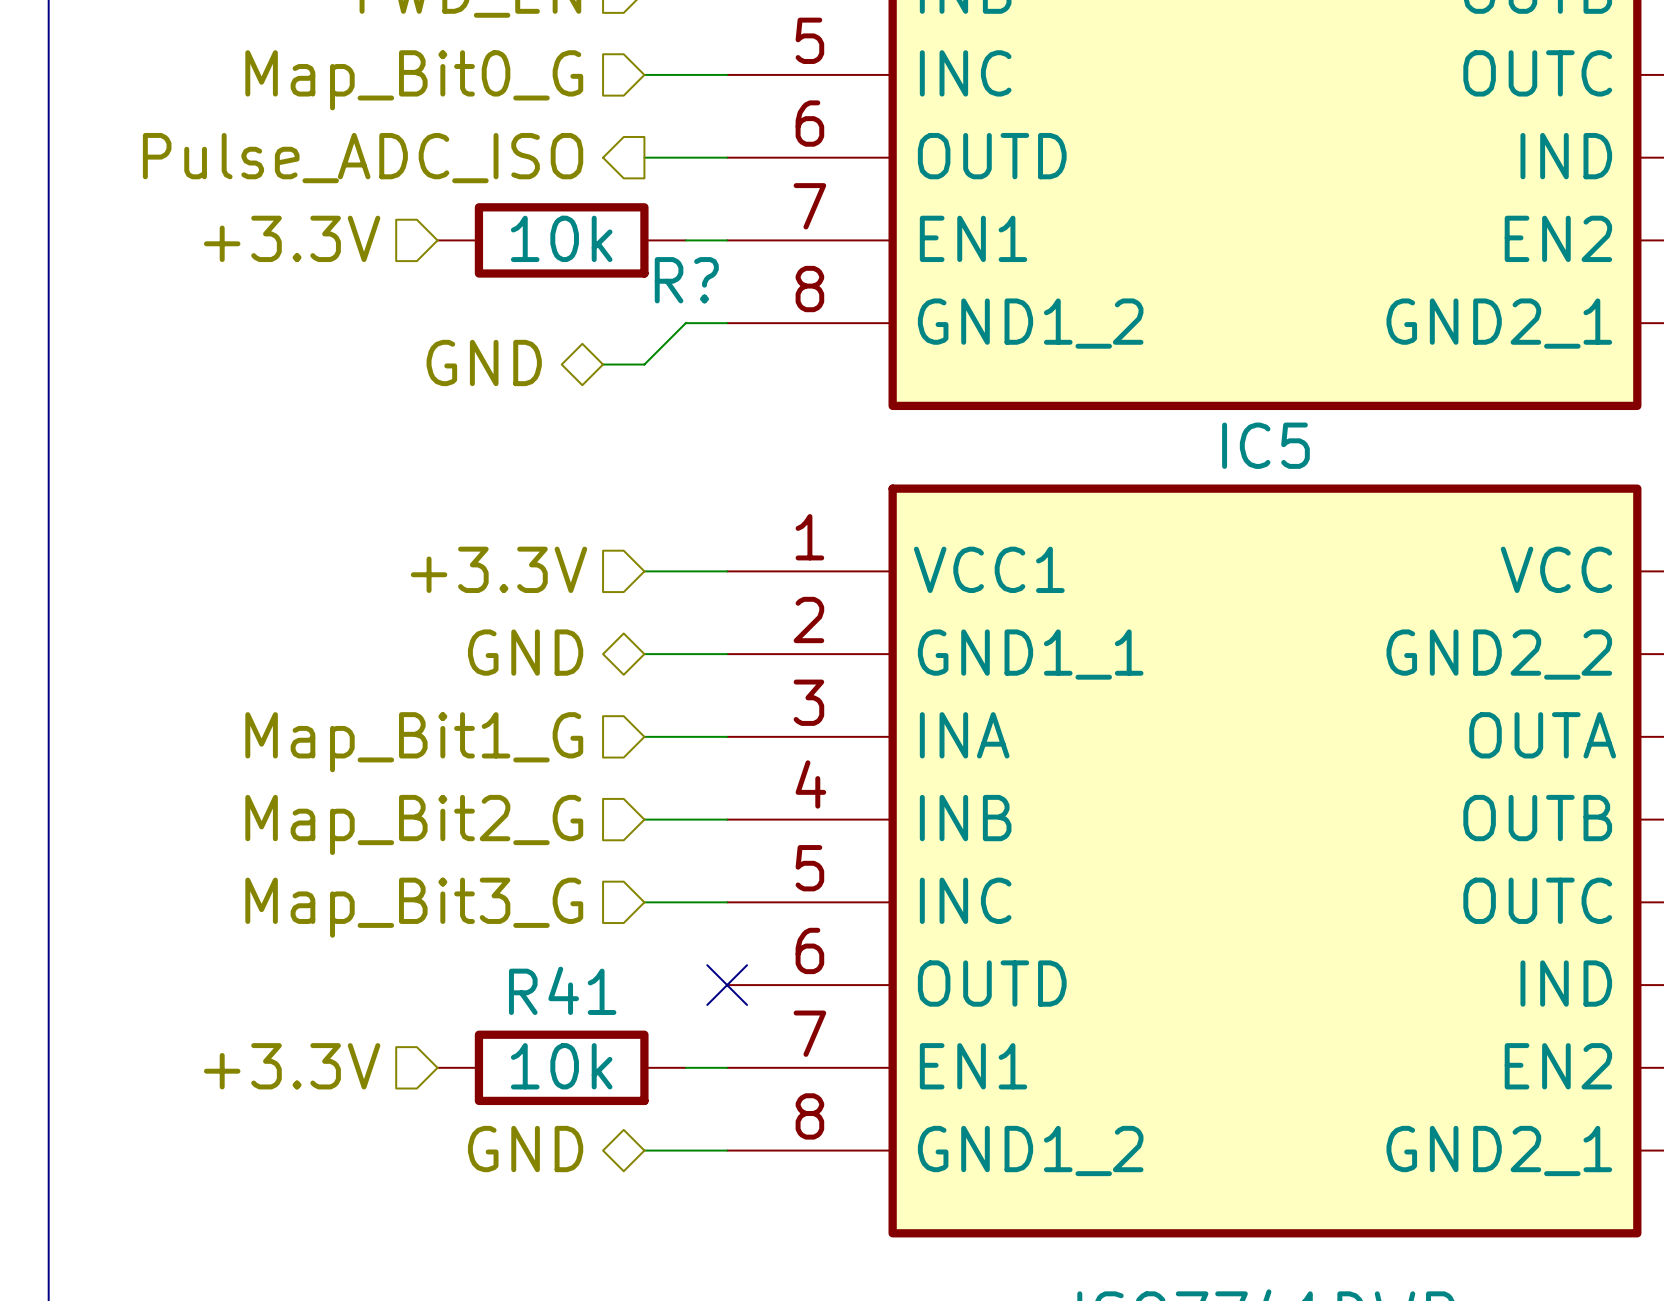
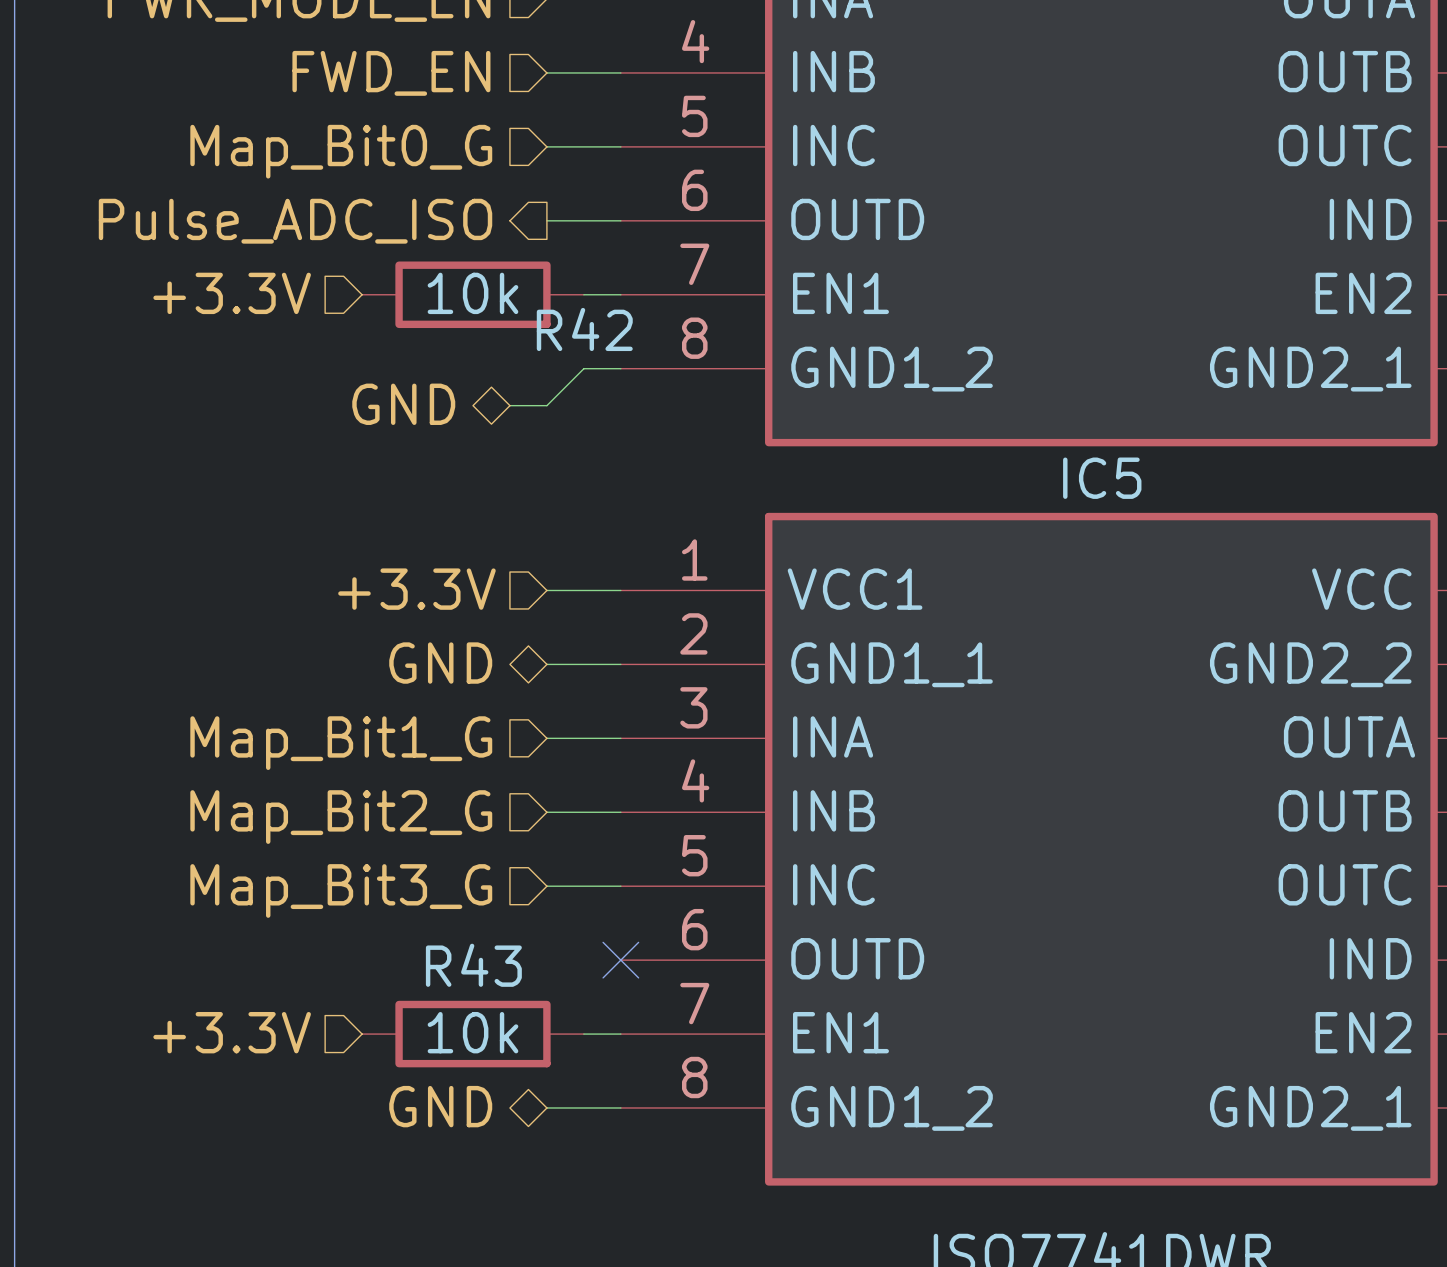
R? name: R? (686, 280) -> R42 (584, 329)
R41 name: R41 (562, 990) -> R43 (473, 965)

